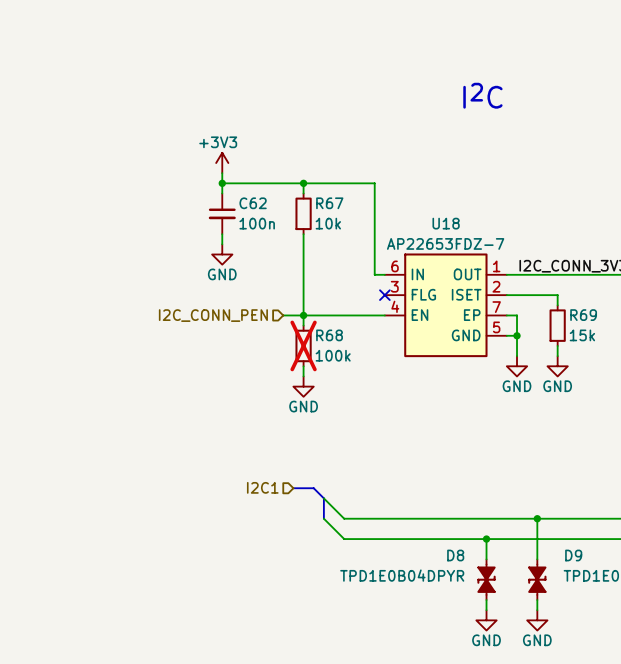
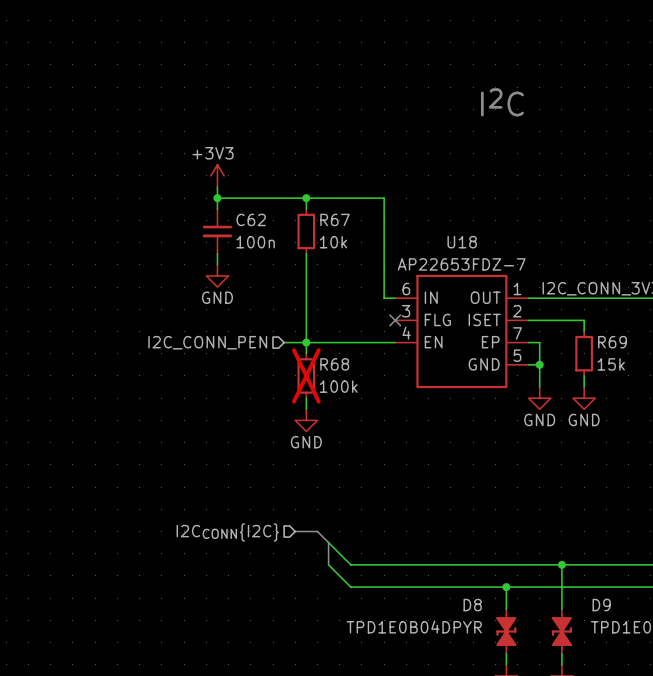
hierarchical label: I2C1 (262, 487) -> I2CCONN{I2C} (227, 532)

